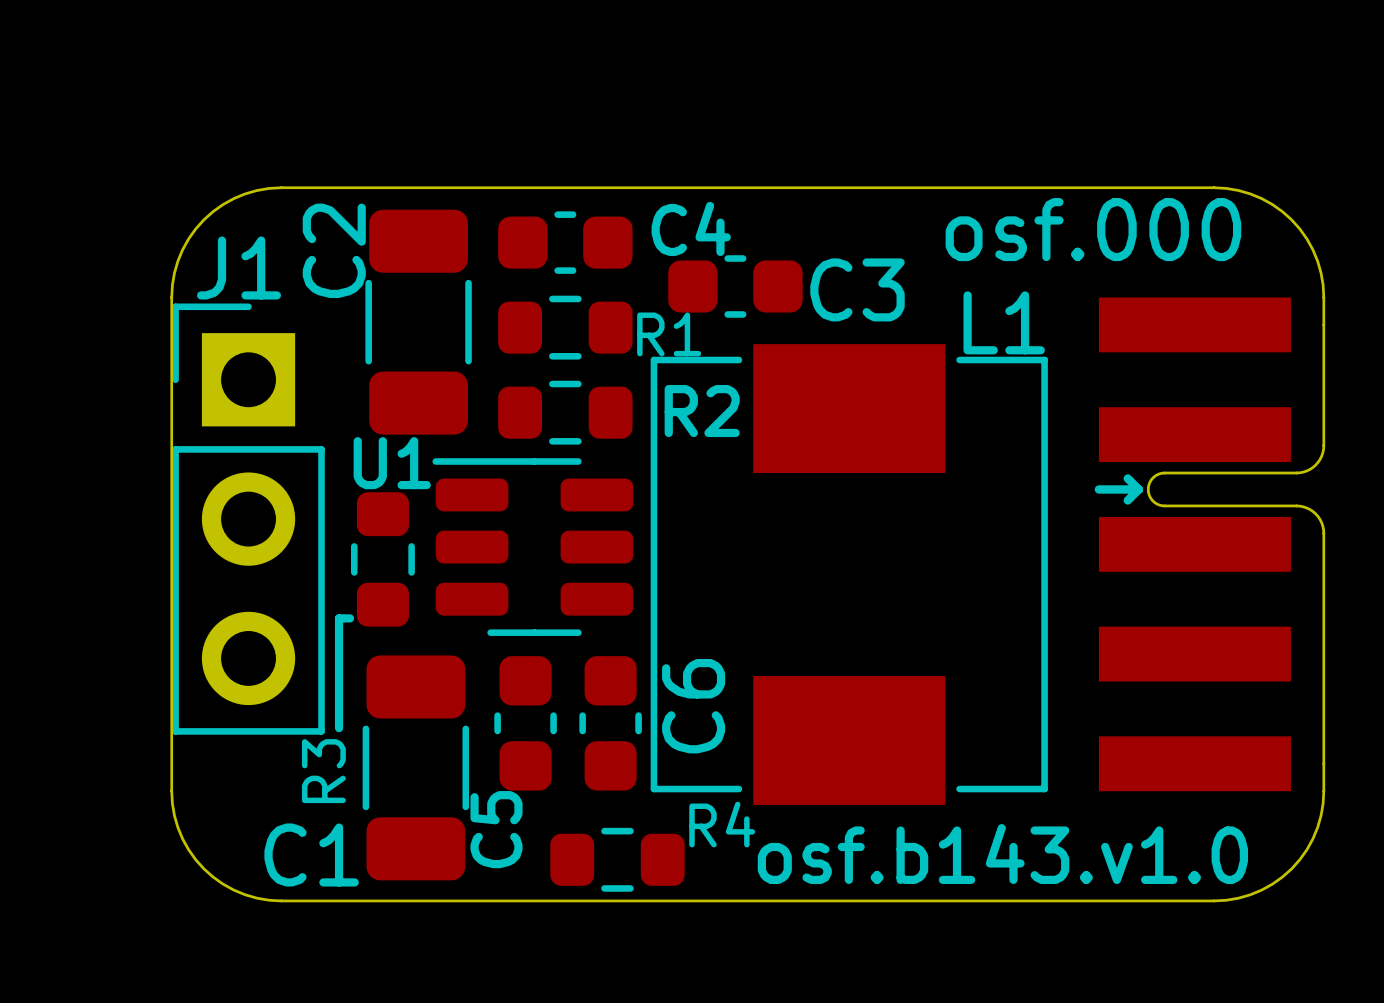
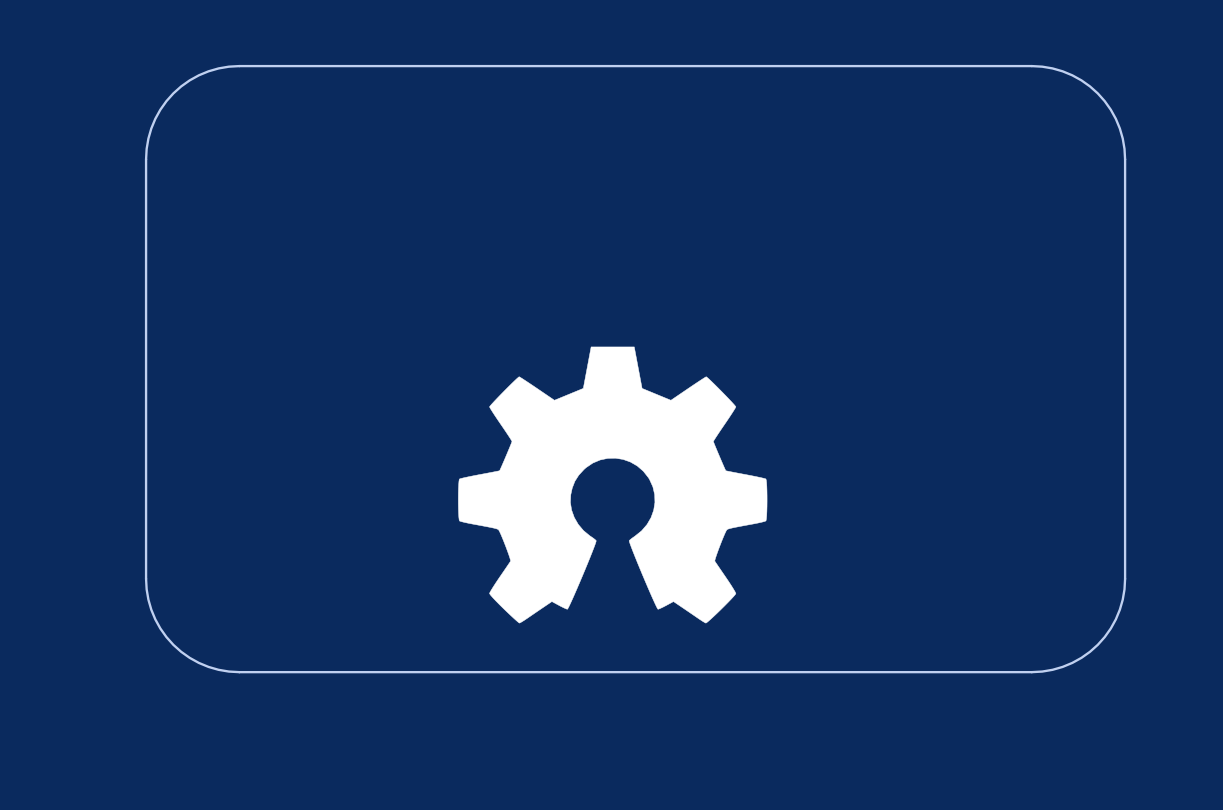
text: osf.000 (1093, 229) -> none
C4: (565, 242) -> none
C3: (735, 286) -> none
C2: (418, 322) -> none
board edge: none -> (1125, 182) (1125, 555)
R1: (565, 327) -> none
R2: (565, 412) -> none
drawing: none -> [458, 346, 768, 624]
J1: (248, 519) -> none
part: (1209, 544) -> none
U1: (532, 547) -> none
R3: (382, 559) -> none
L1: (849, 574) -> none
line: (350, 618) (339, 618) (339, 728) -> none
C5: (525, 723) -> none
C6: (610, 723) -> none
C1: (415, 767) -> none
text: osf.b143.v1.0 (1002, 854) -> none
R4: (617, 859) -> none

